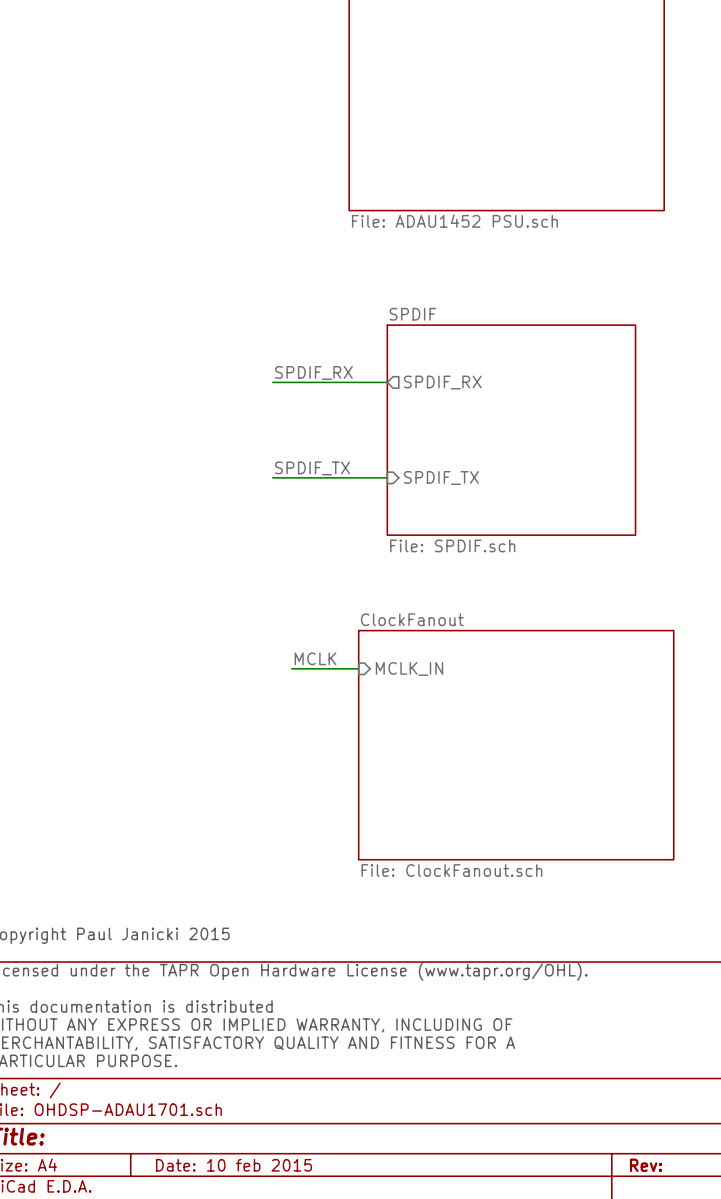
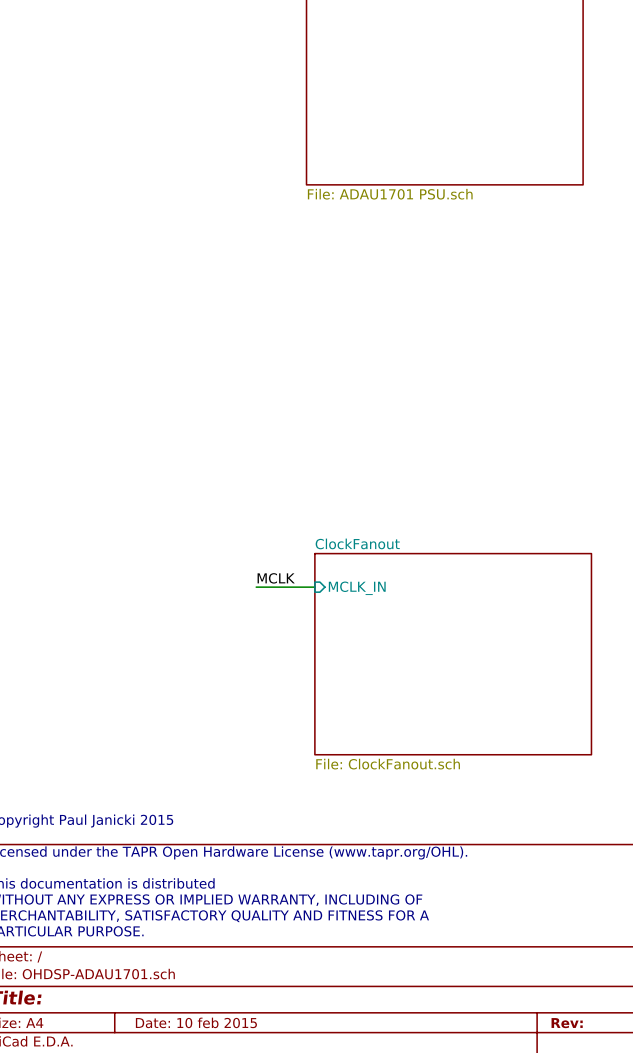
sheet value: File: ADAU1452 PSU.sch (454, 221) -> File: ADAU1701 PSU.sch (390, 194)
label: SPDIF_RX (313, 372) -> none
wire: (272, 382) (387, 382) -> none
sheet pin: SPDIF_RX (442, 382) -> none
sheet SPDIF: File: SPDIF.sch (511, 430) -> none
label: SPDIF_TX (312, 468) -> none
wire: (272, 477) (387, 477) -> none
sheet pin: SPDIF_TX (441, 477) -> none

